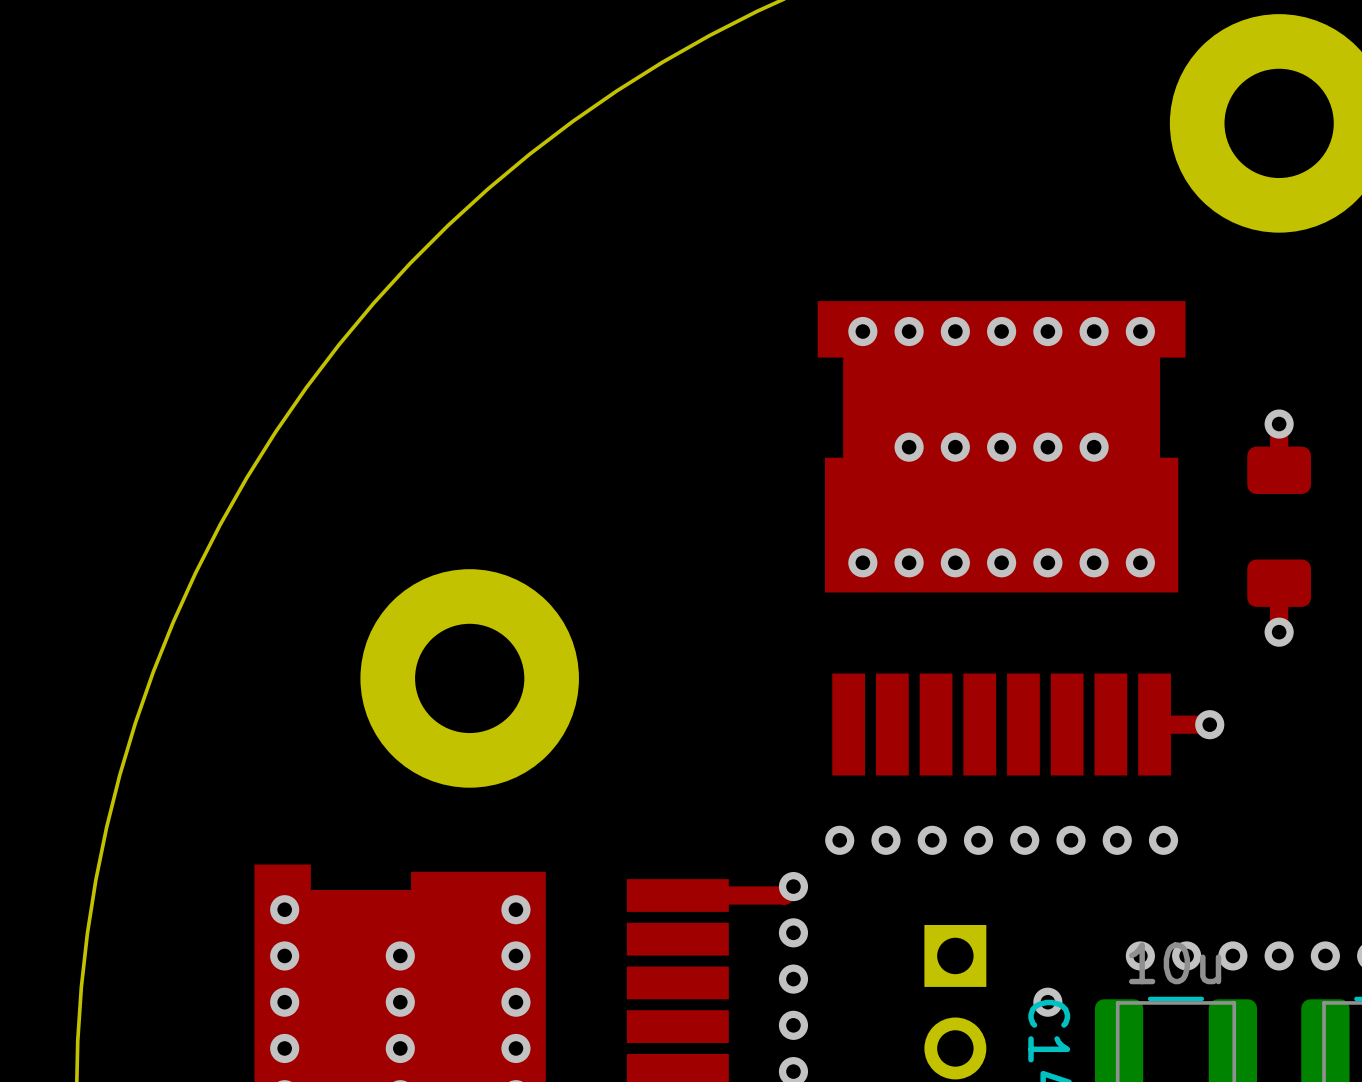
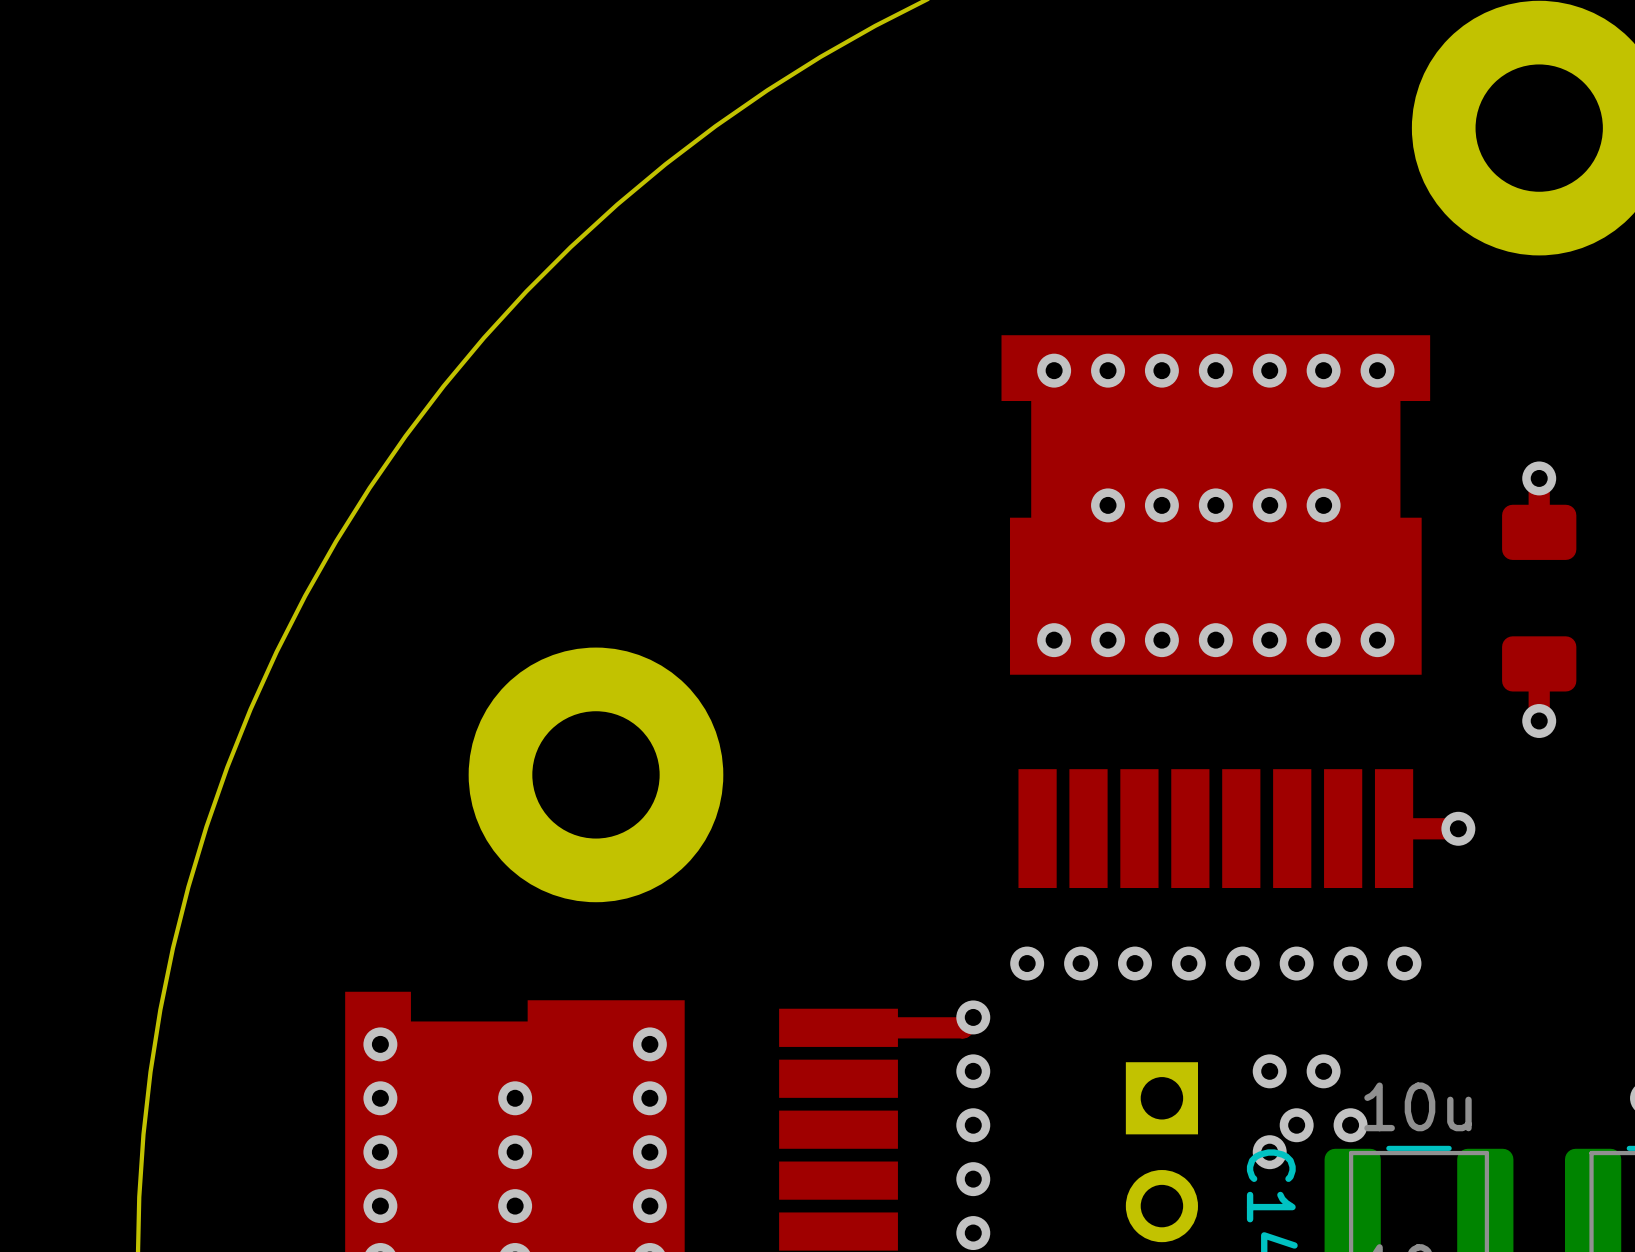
via: none -> (1269, 1071)
via: none -> (1323, 1071)
via position: (1140, 955) -> (1350, 1125)
via: (1186, 955) -> none
via: (1232, 955) -> none
via: (1279, 955) -> none
via: (1325, 955) -> none
via: none -> (1296, 1125)

